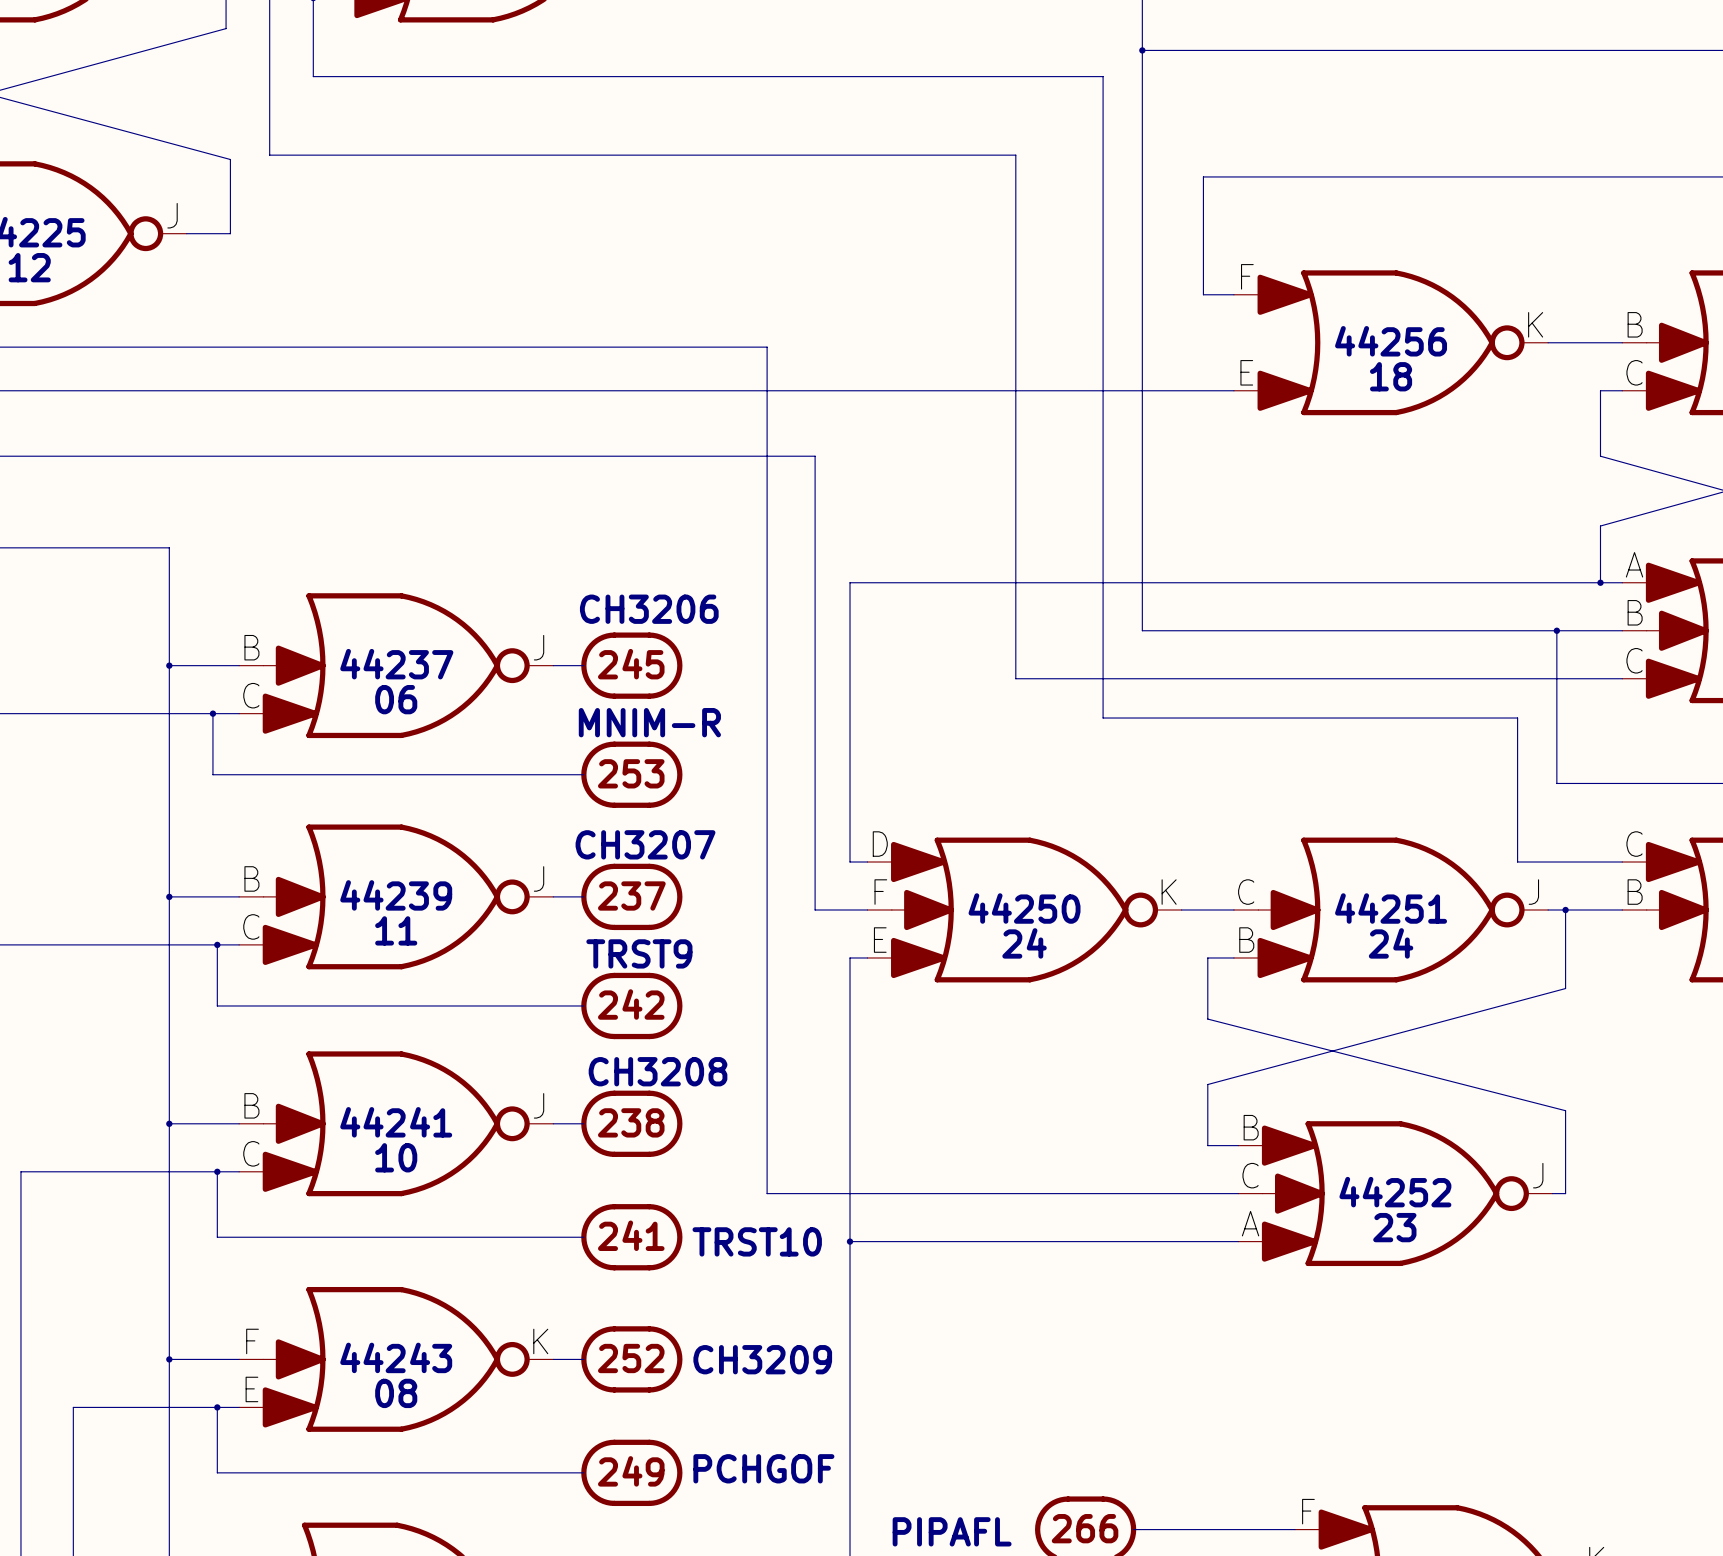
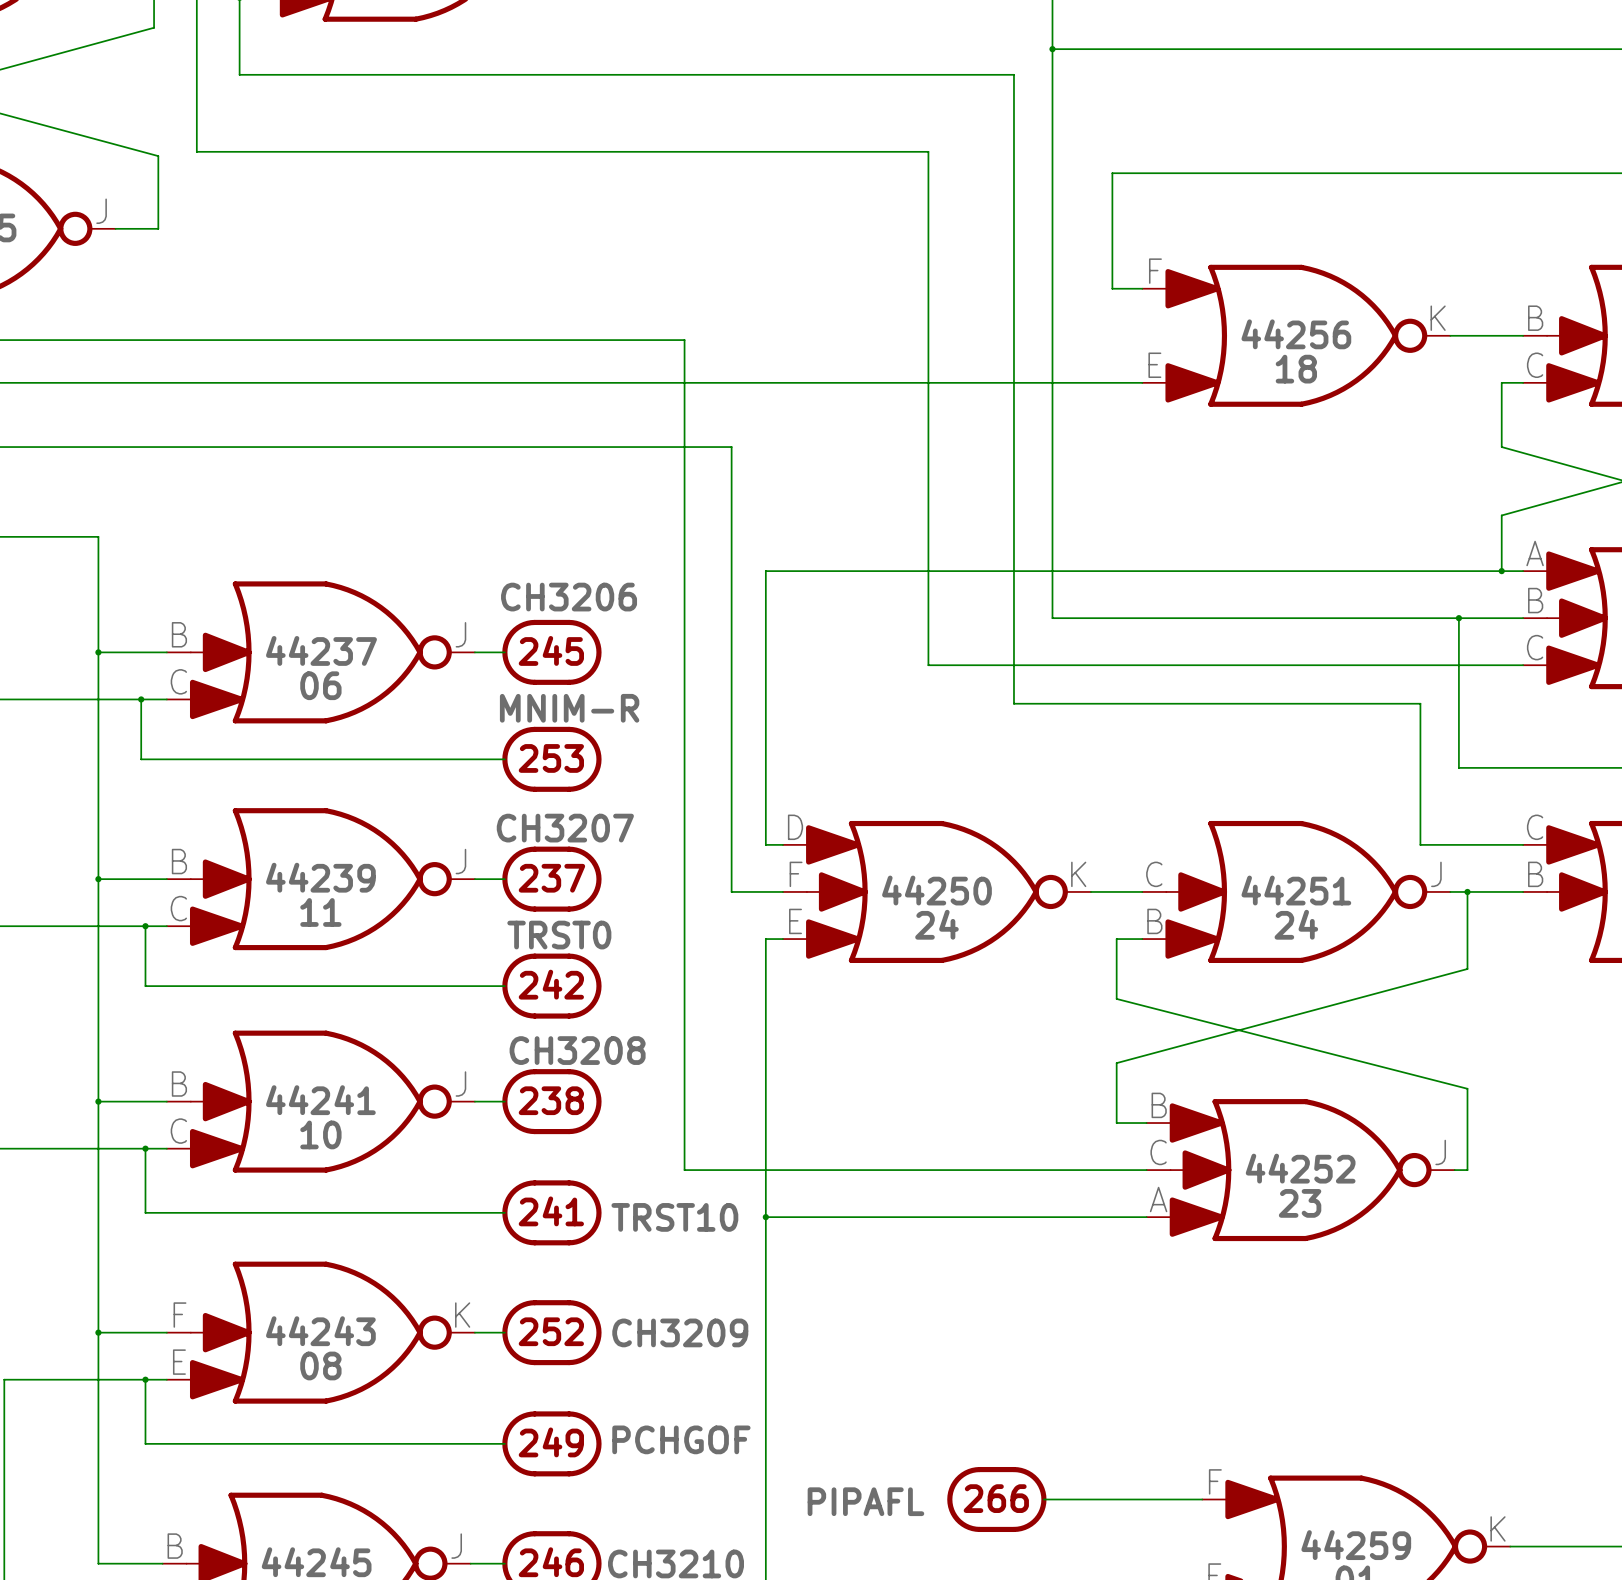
part text: TRST9 (639, 953) -> TRST0 (559, 935)

